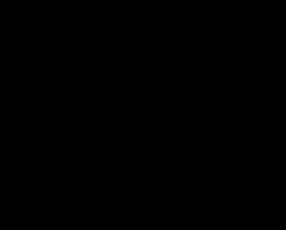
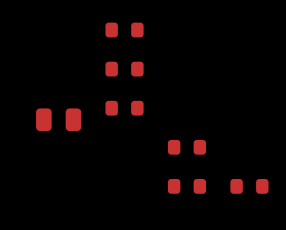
part: none -> (124, 30)
part: none -> (124, 69)
part: none -> (124, 108)
part: none -> (58, 119)
part: none -> (186, 147)
part: none -> (186, 186)
part: none -> (249, 186)

